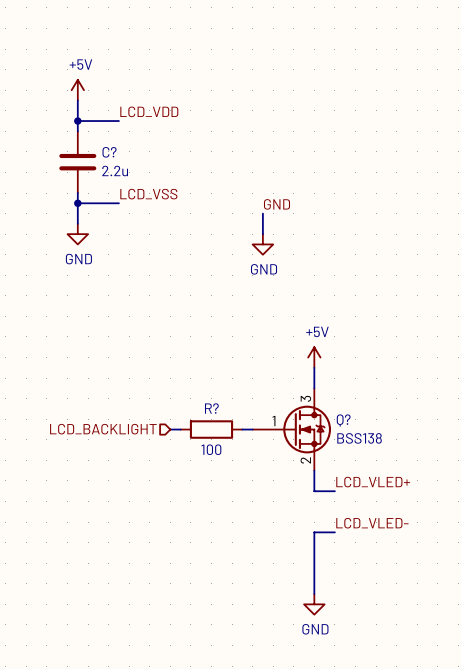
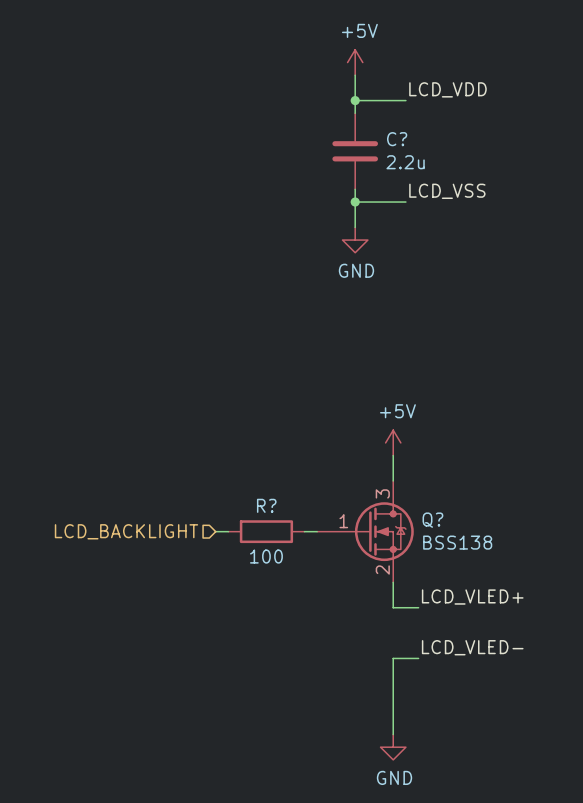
power symbol: none -> +5V (355, 62)
wire: none -> (355, 75) (355, 113)
label: none -> LCD_VDD (447, 89)
wire: none -> (355, 100) (405, 100)
junction: none -> (355, 100)
power symbol: +5V (77, 90) -> none
wire: (77, 100) (77, 131) -> none
label: LCD_VDD (149, 111) -> none
wire: (77, 121) (118, 121) -> none
junction: (77, 121) -> none
C?: none -> 2.2u (355, 151)
wire: none -> (355, 189) (355, 227)
label: none -> LCD_VSS (447, 191)
C?: 2.2u (77, 162) -> none
wire: none -> (355, 202) (405, 202)
junction: none -> (355, 202)
wire: (77, 193) (77, 223) -> none
label: LCD_VSS (148, 194) -> none
wire: (77, 203) (118, 203) -> none
junction: (77, 203) -> none
label: GND (277, 204) -> none
wire: (262, 213) (262, 234) -> none
power symbol: GND (77, 234) -> none
power symbol position: GND (262, 244) -> GND (355, 240)

